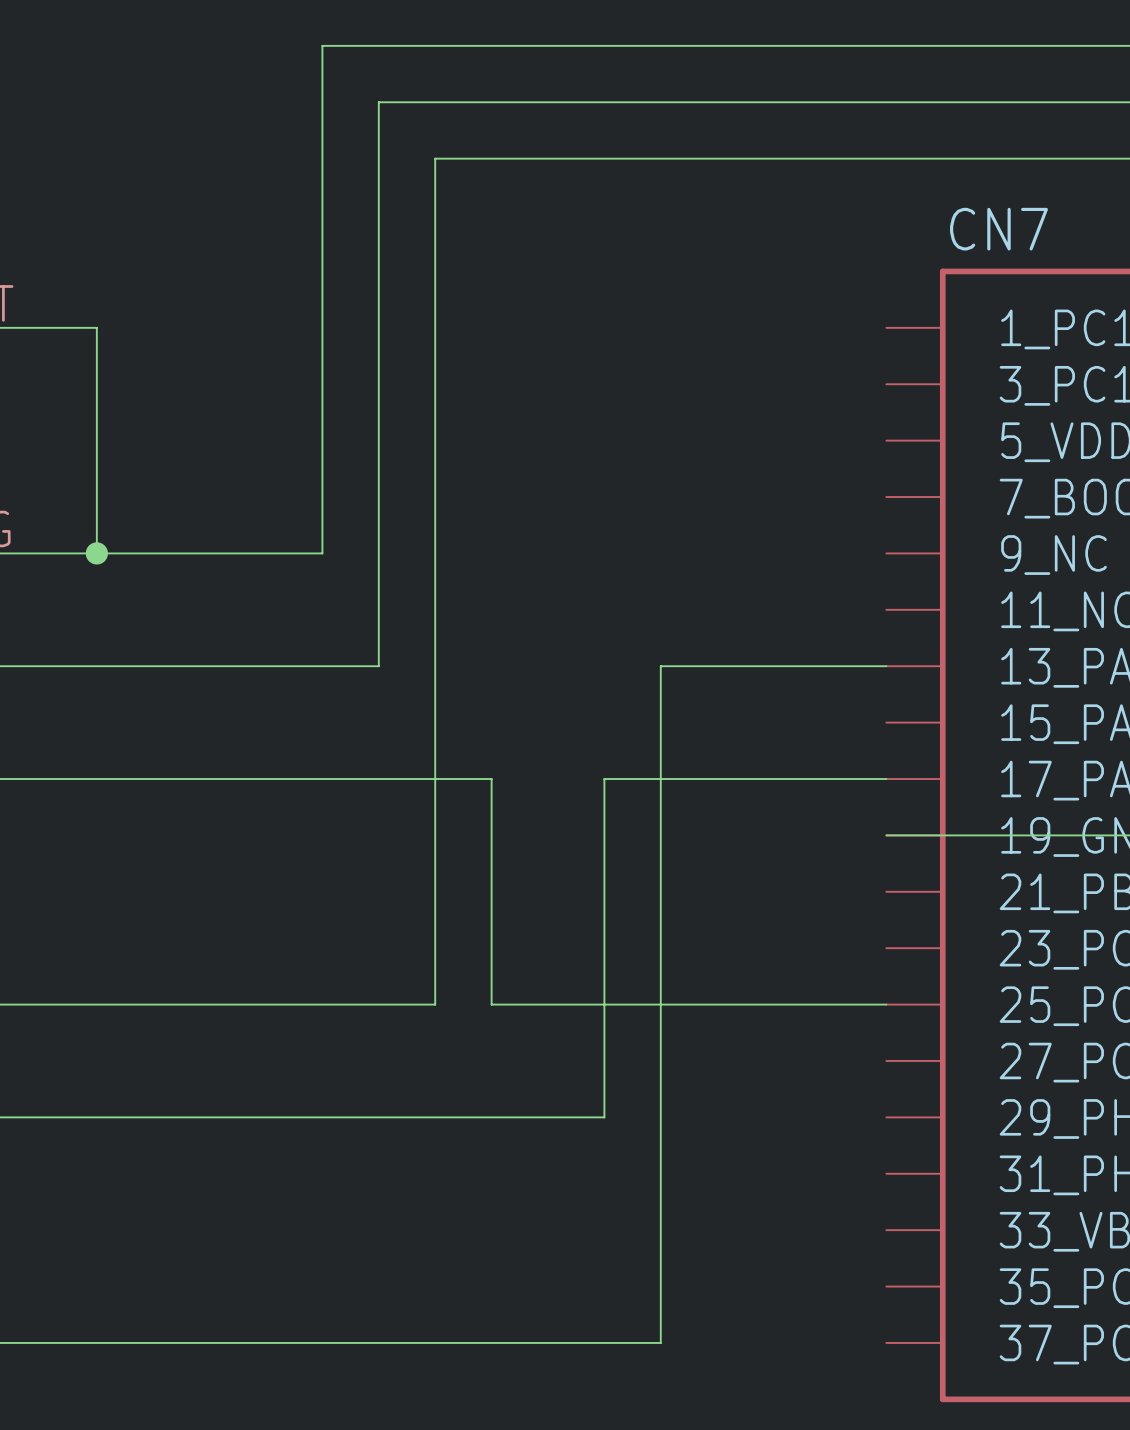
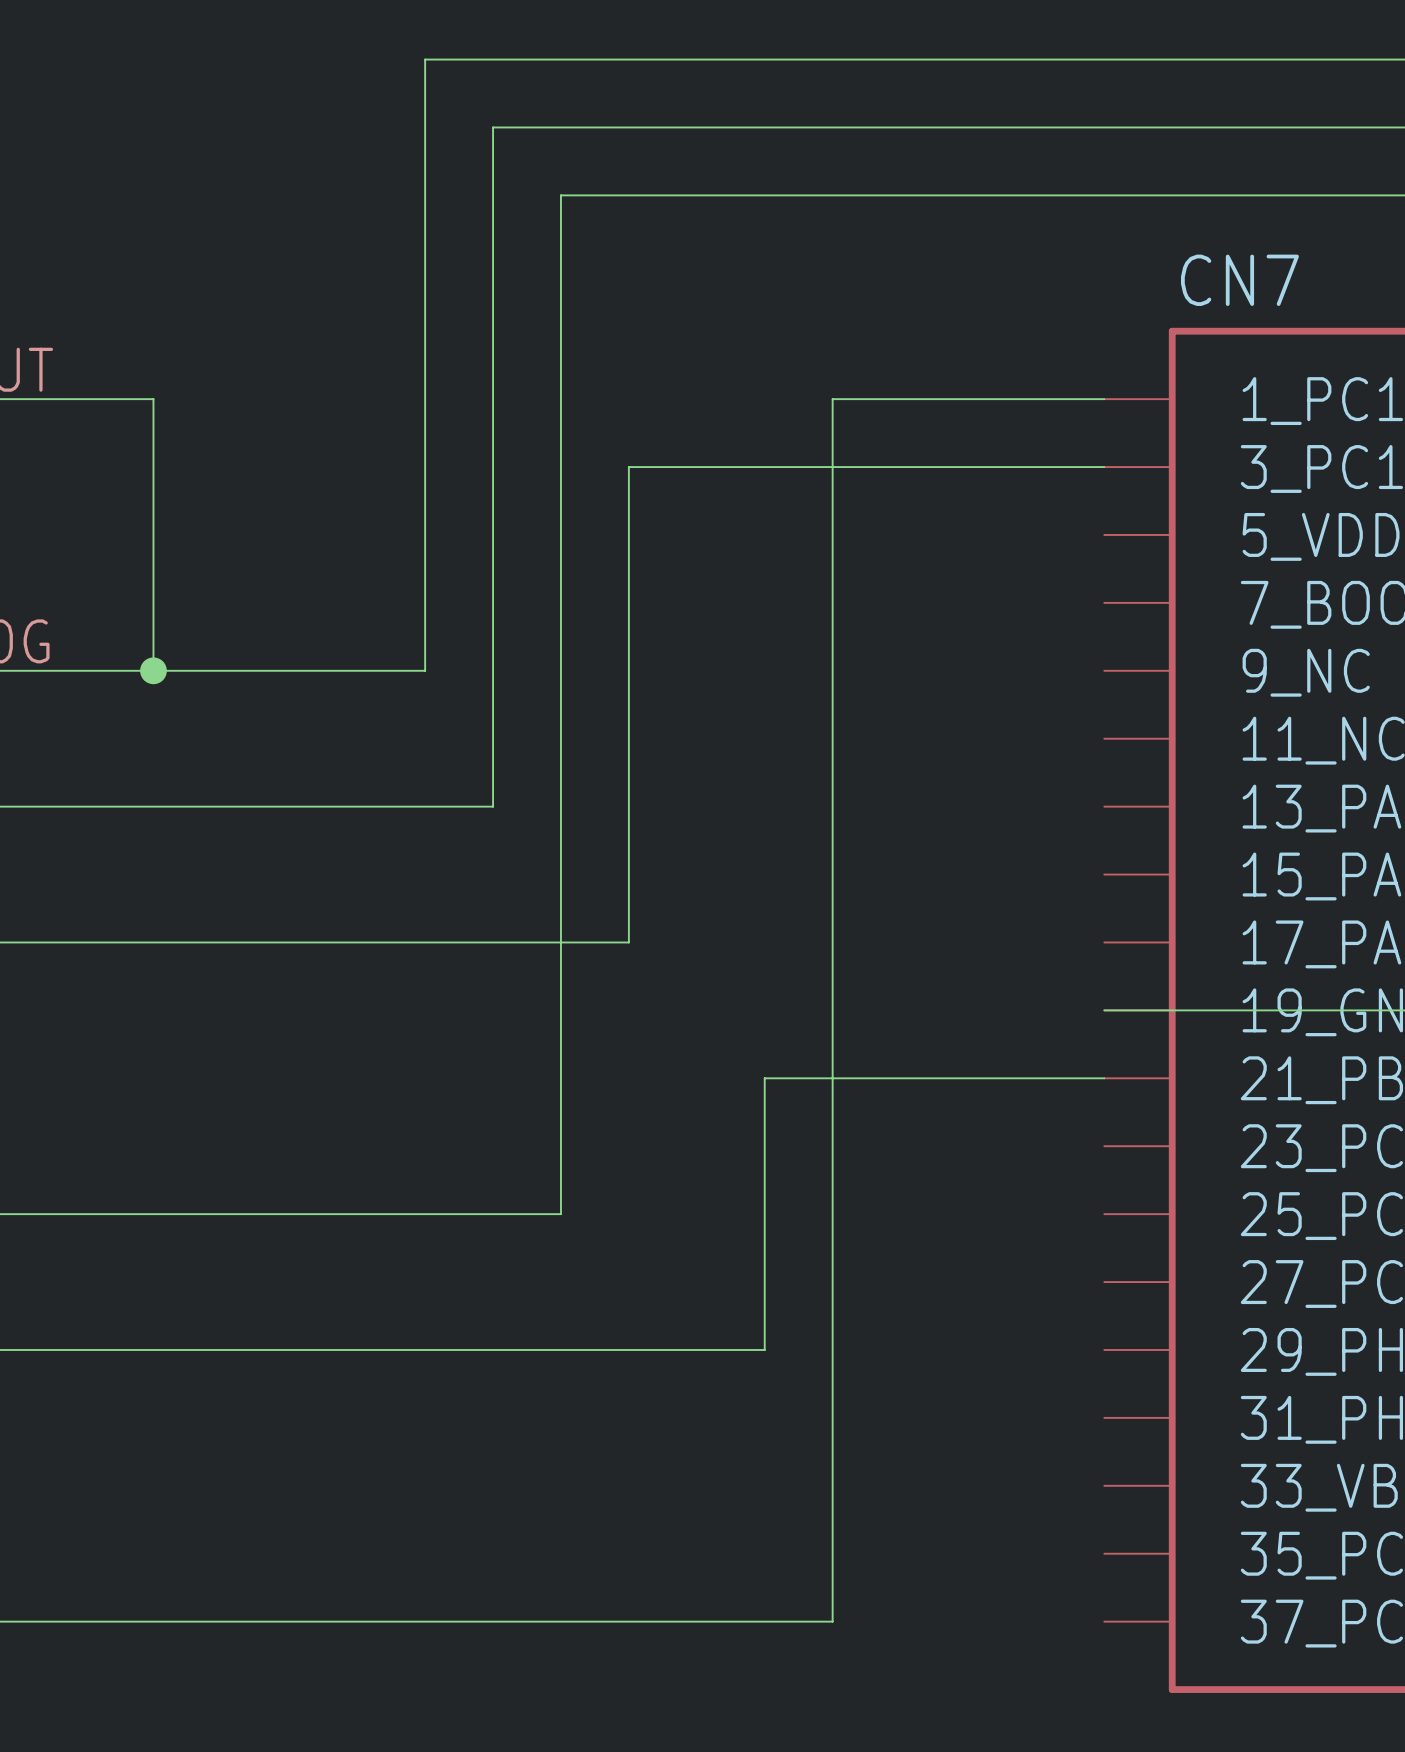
wire: (660, 666) (886, 666) -> (832, 806) (832, 399) (1104, 399)
wire: (491, 779) (491, 1004) (886, 1004) -> (628, 942) (628, 467) (1104, 467)
wire: (886, 779) (604, 779) (604, 891) -> (1104, 1078) (764, 1078)

